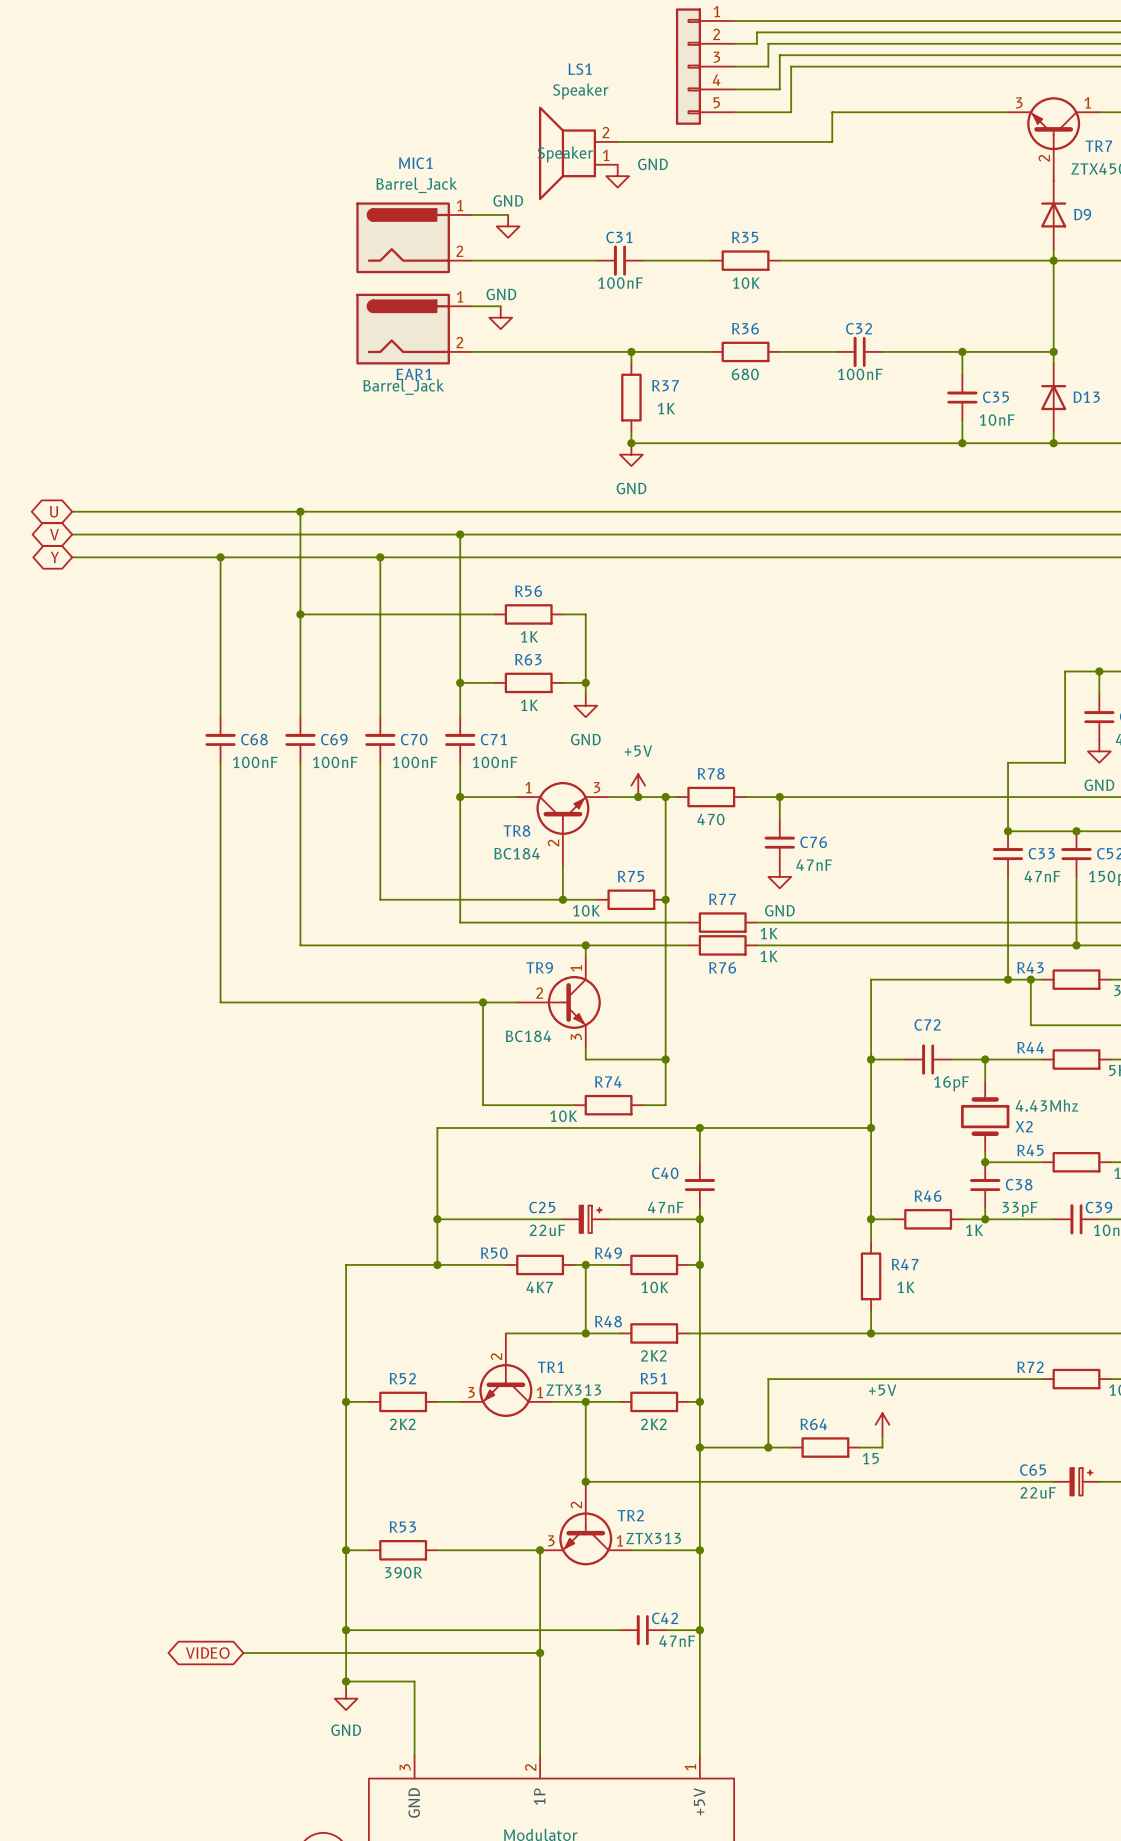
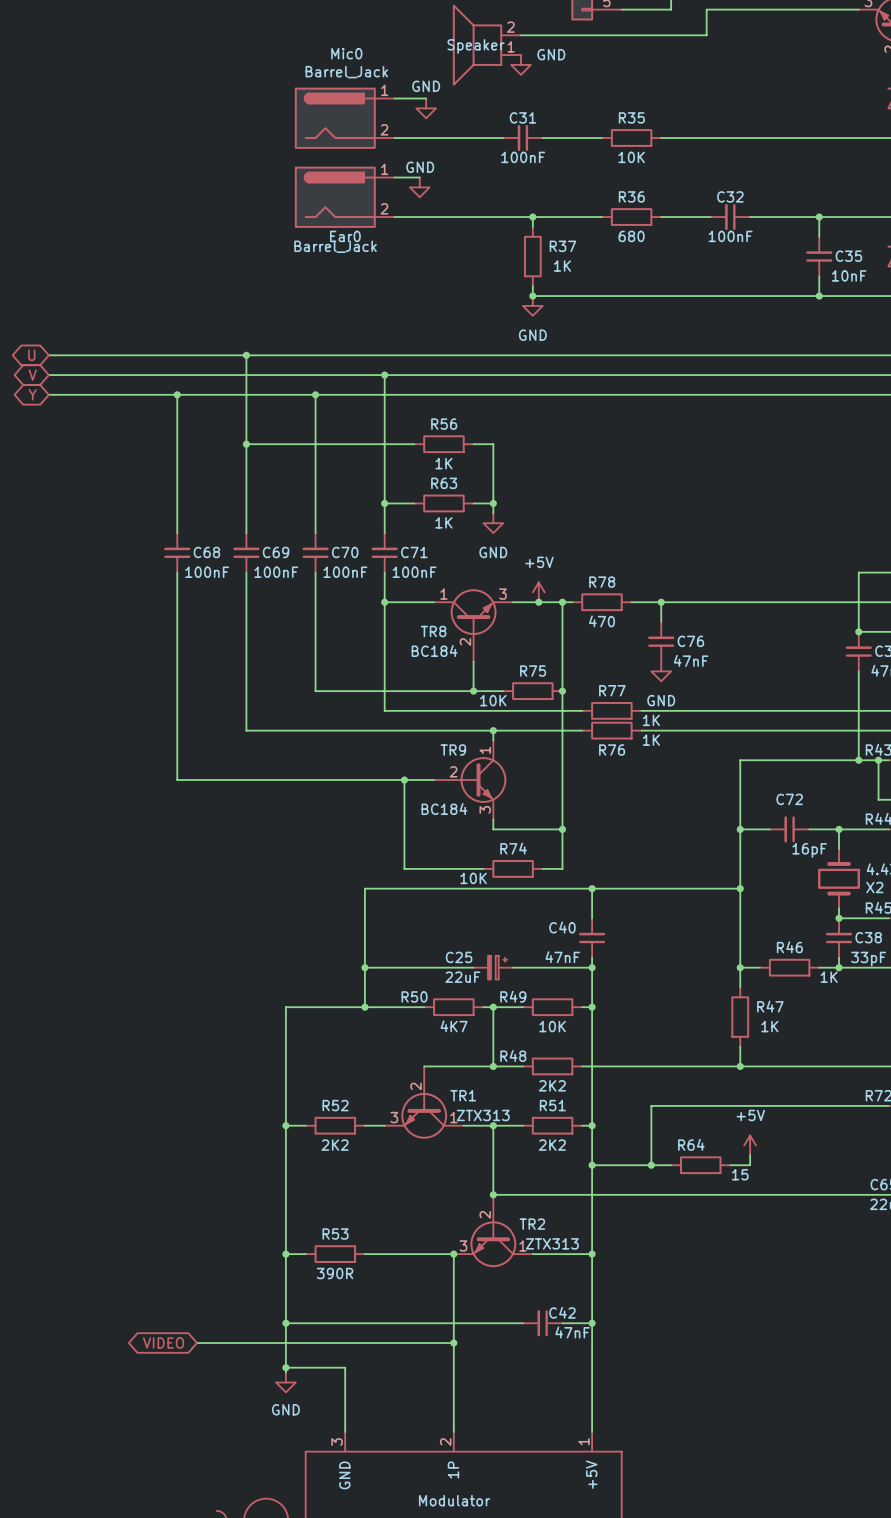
MIC1 name: MIC1 (415, 163) -> Mic0 (346, 53)
EAR1 name: EAR1 (414, 374) -> Ear0 (345, 236)

